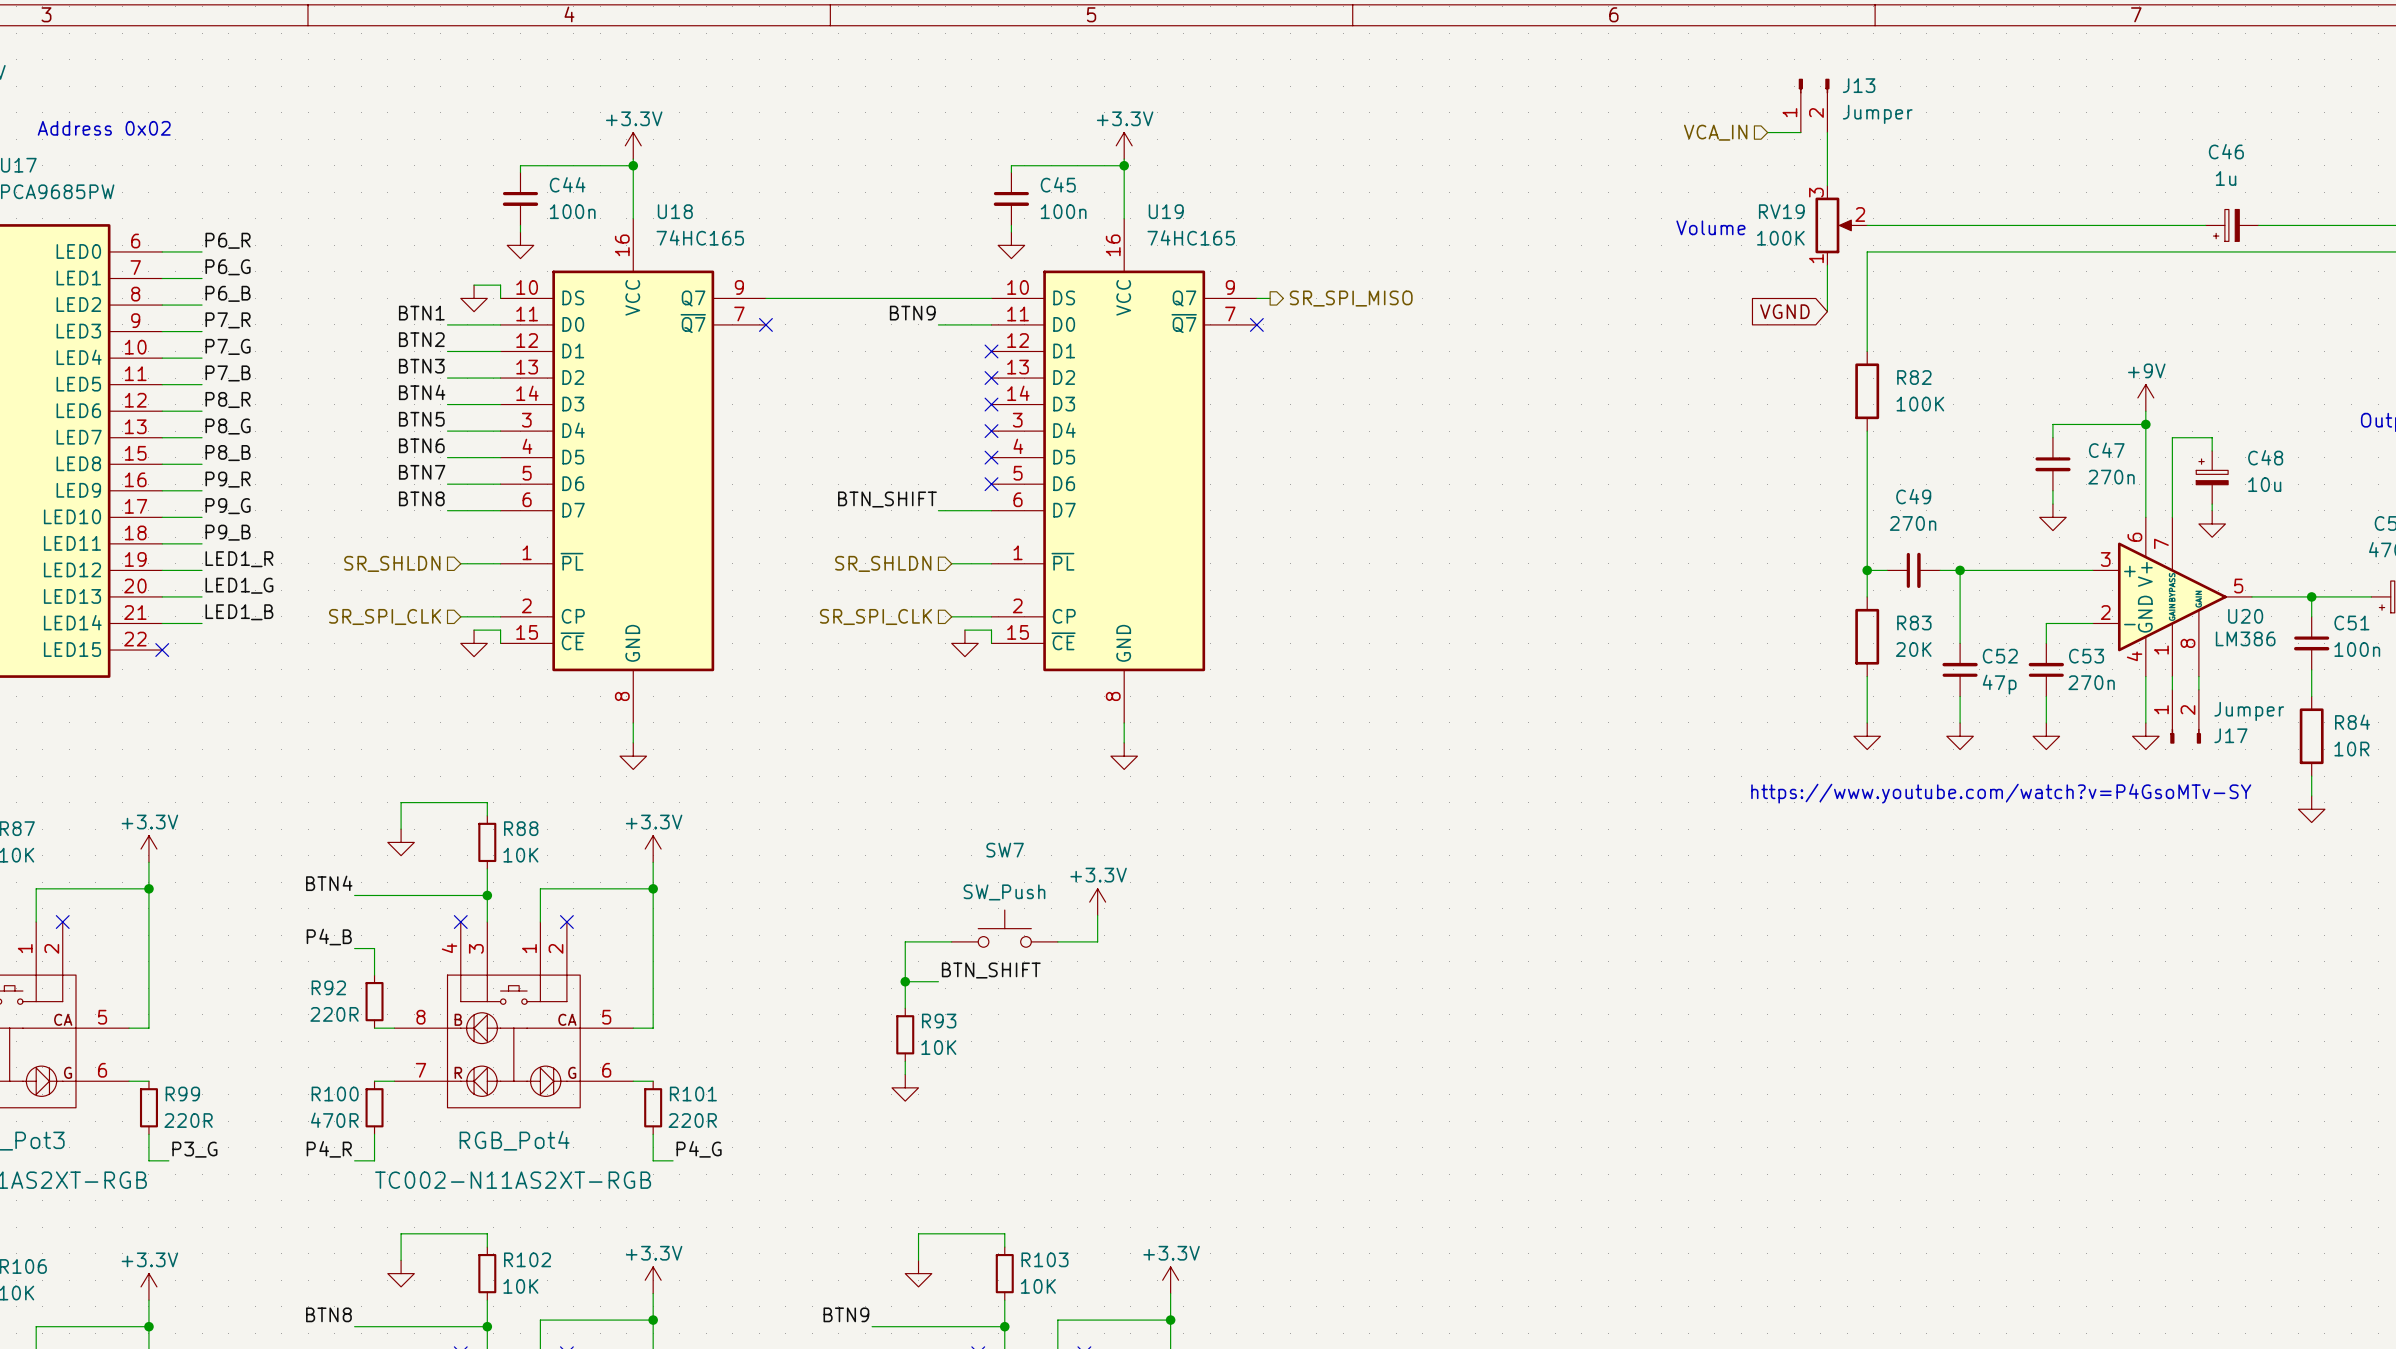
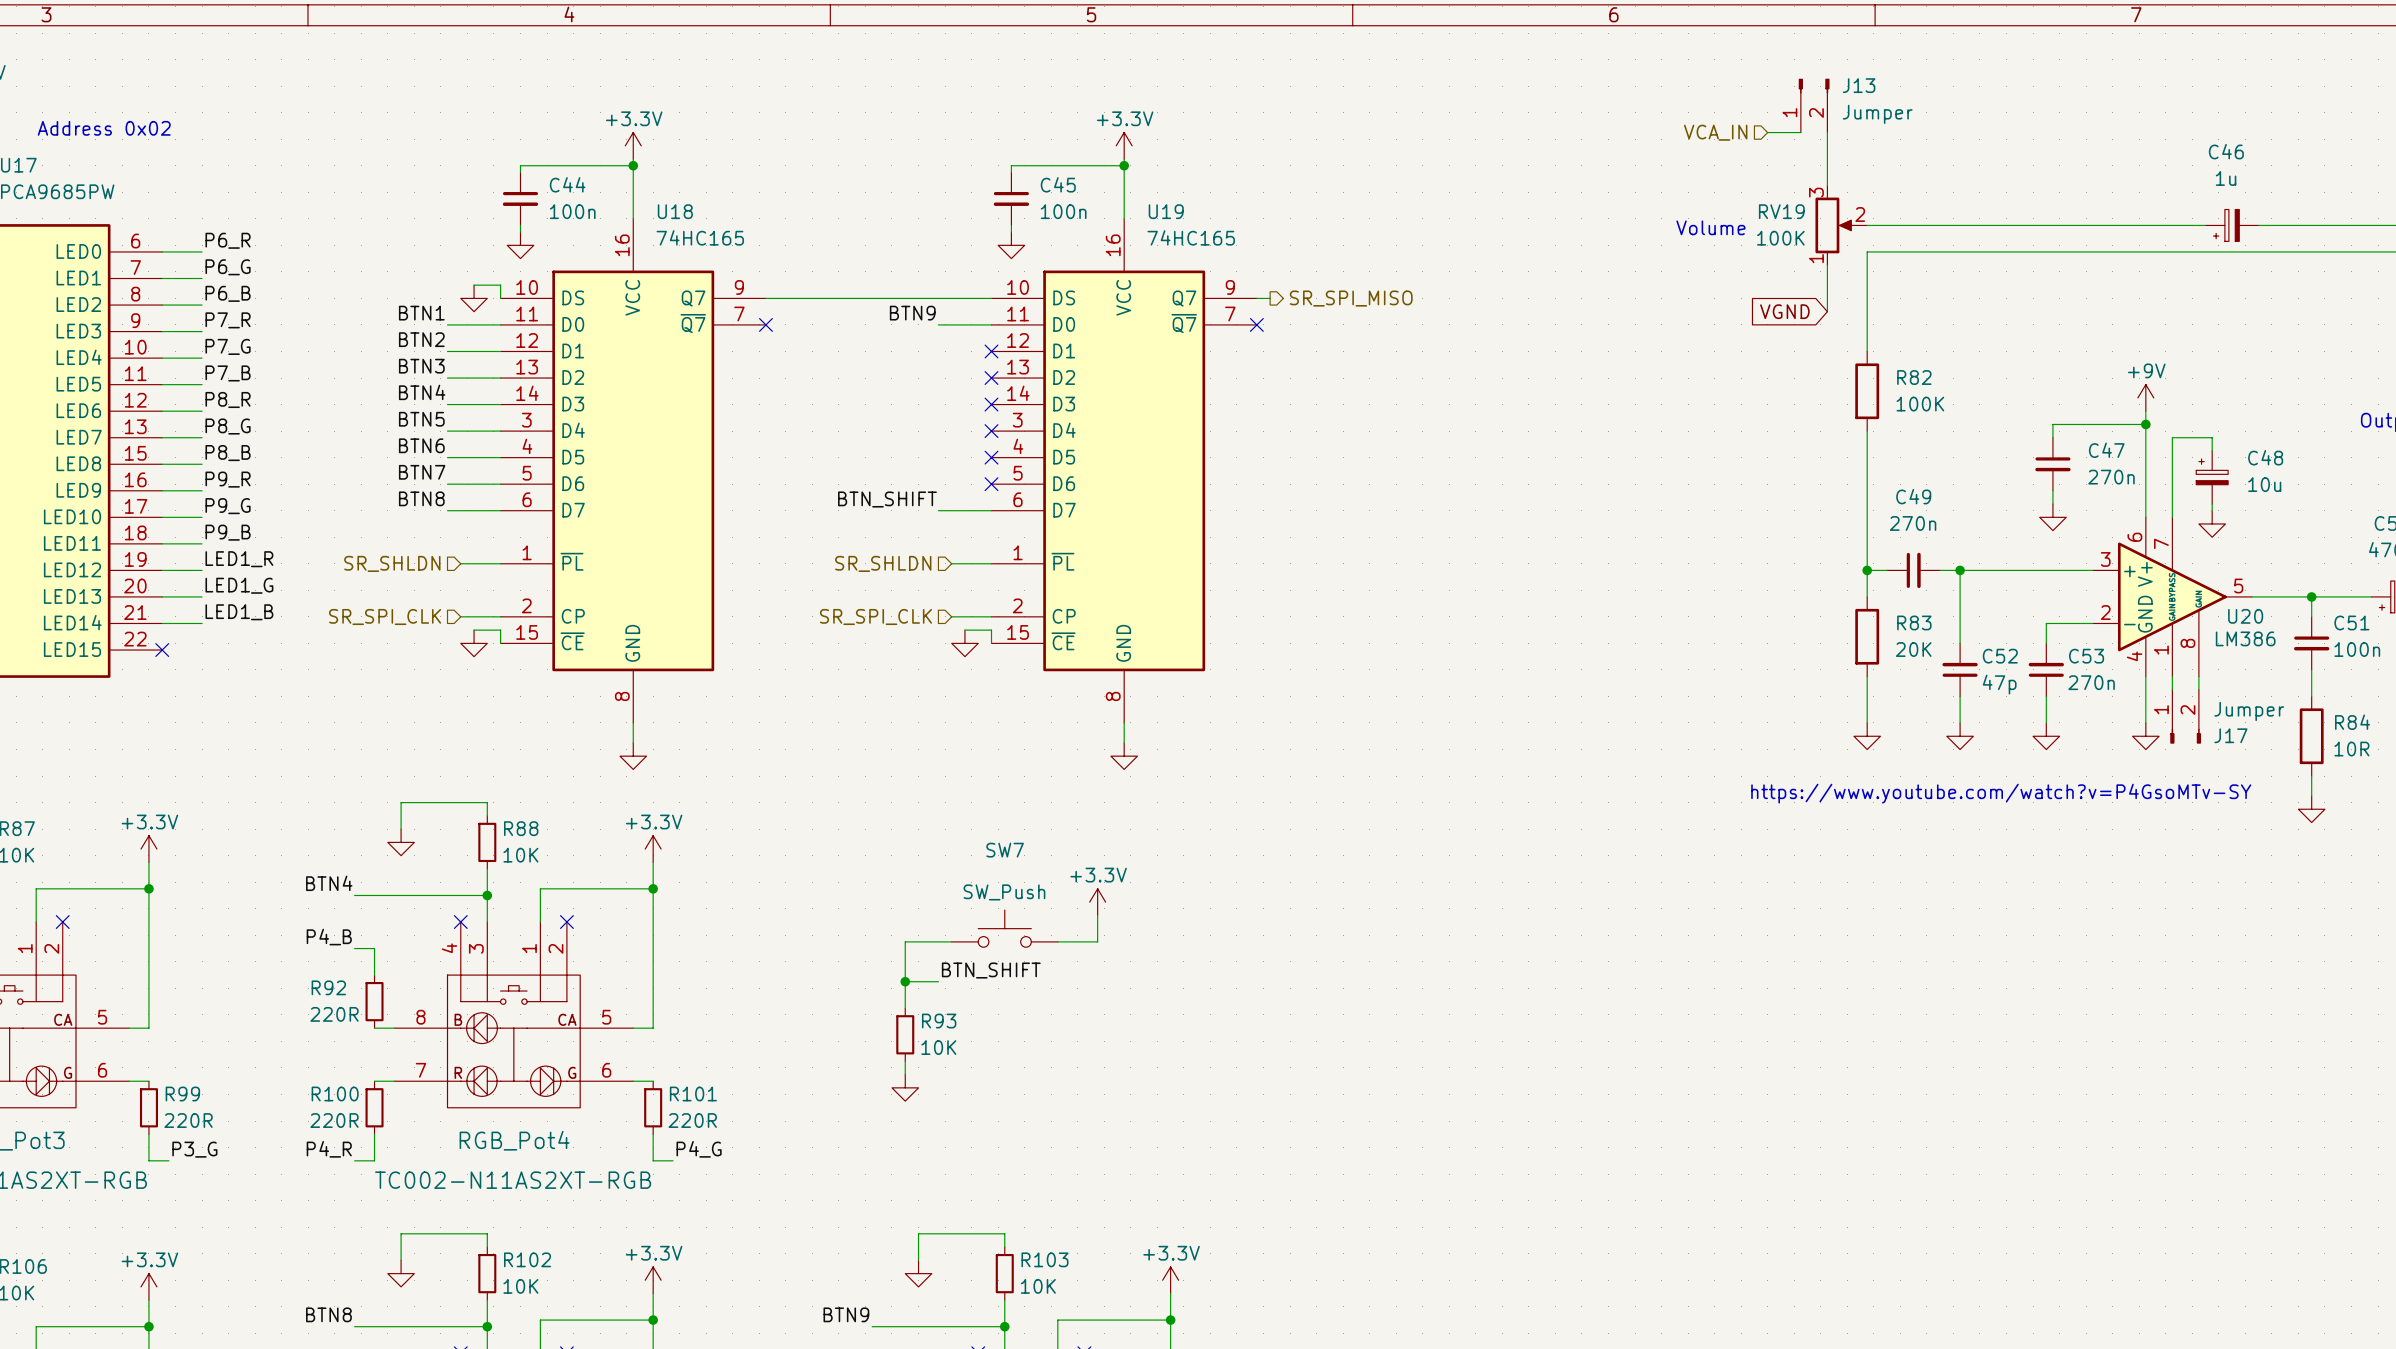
R100 value: 470R (334, 1120) -> 220R (334, 1120)

